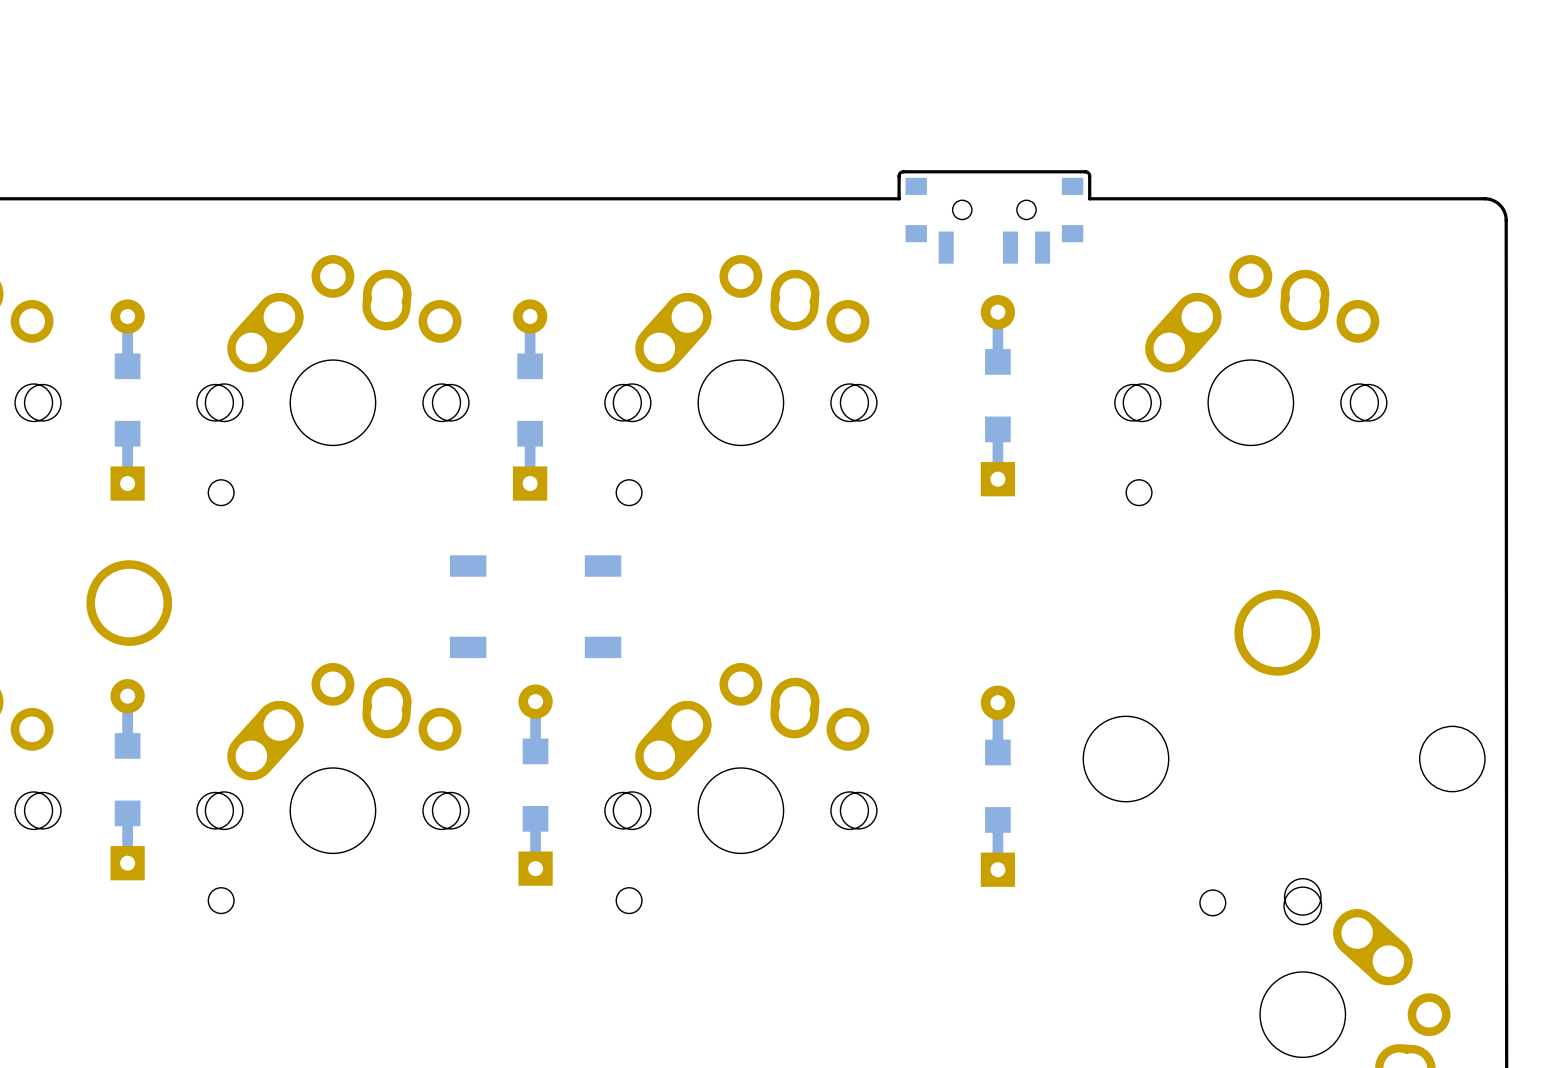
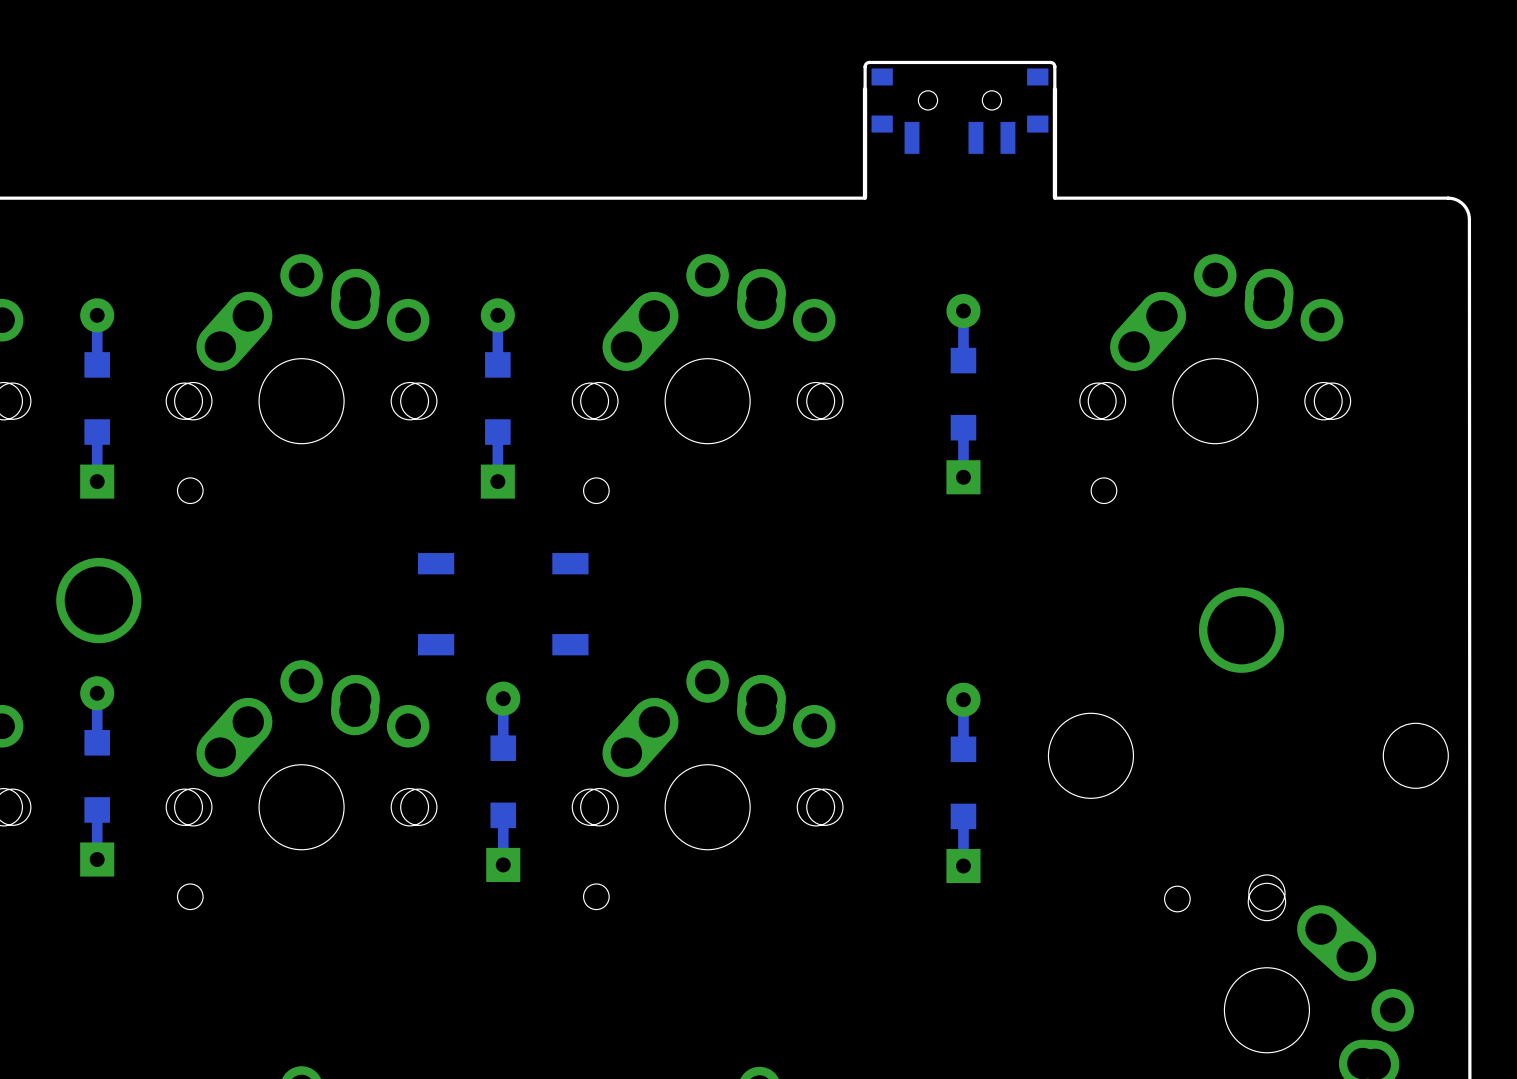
board edge: none -> (1054, 89) (1054, 197)
board edge: (899, 198) (899, 175) (903, 171) (1085, 171) (1089, 175) (1089, 198) -> (865, 197) (865, 66) (867, 62) (1051, 62) (1054, 66) (1054, 89)
part position: (994, 220) -> (959, 111)

